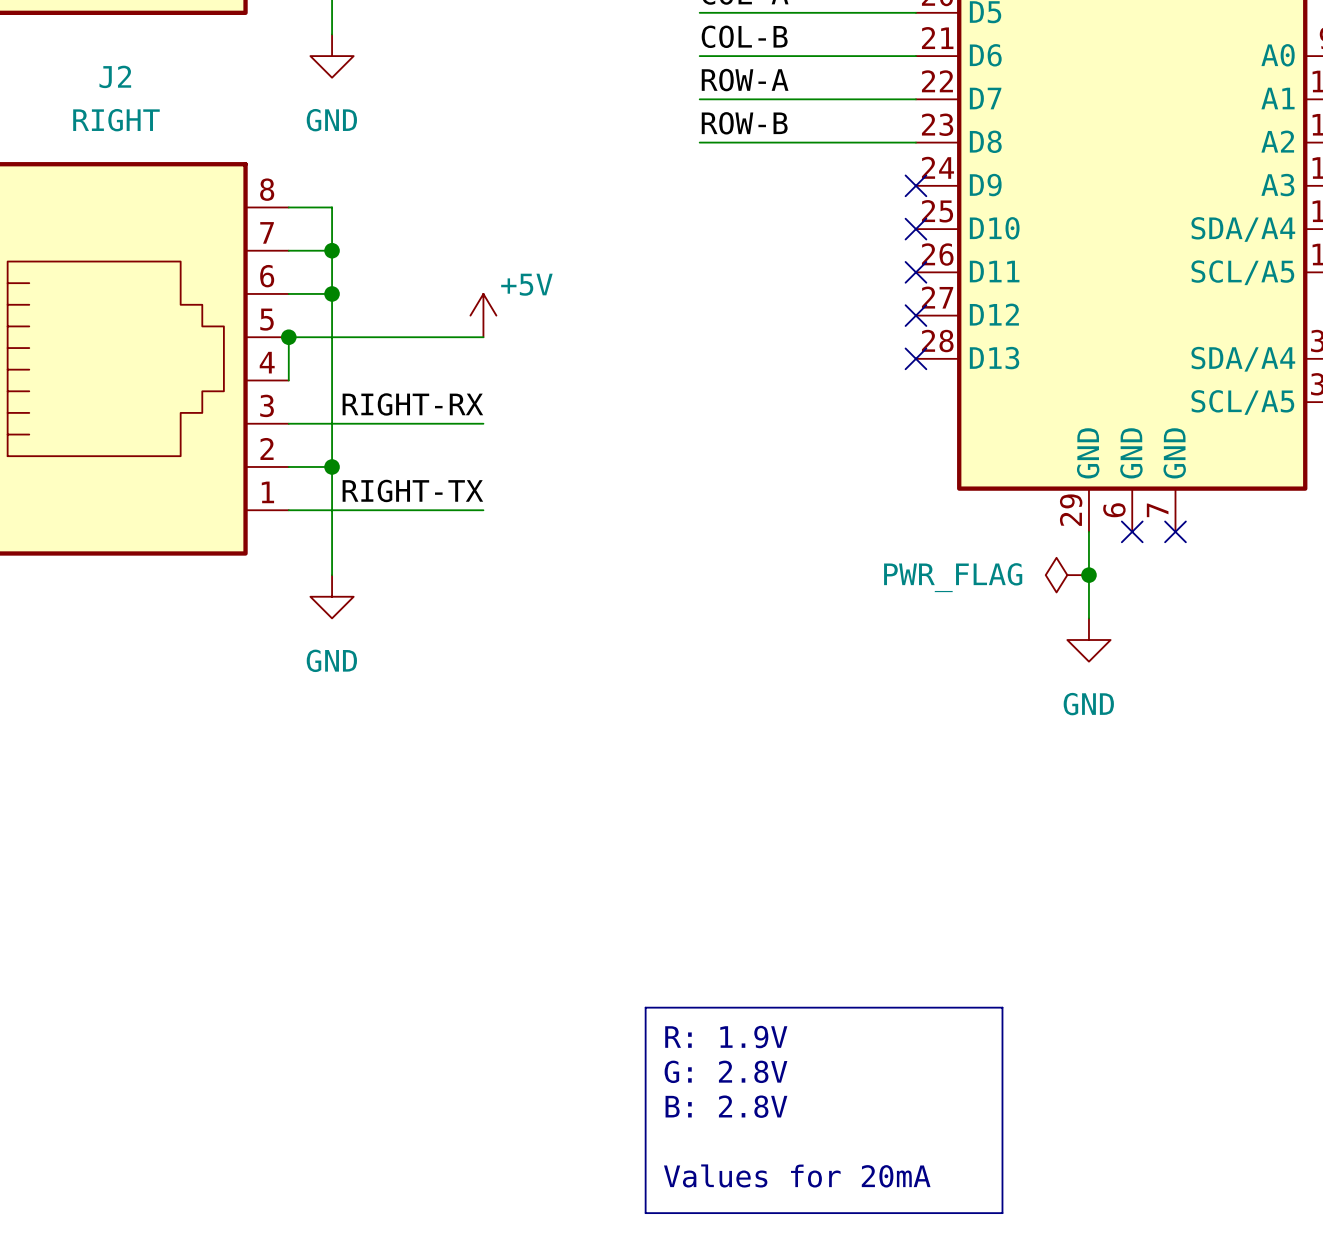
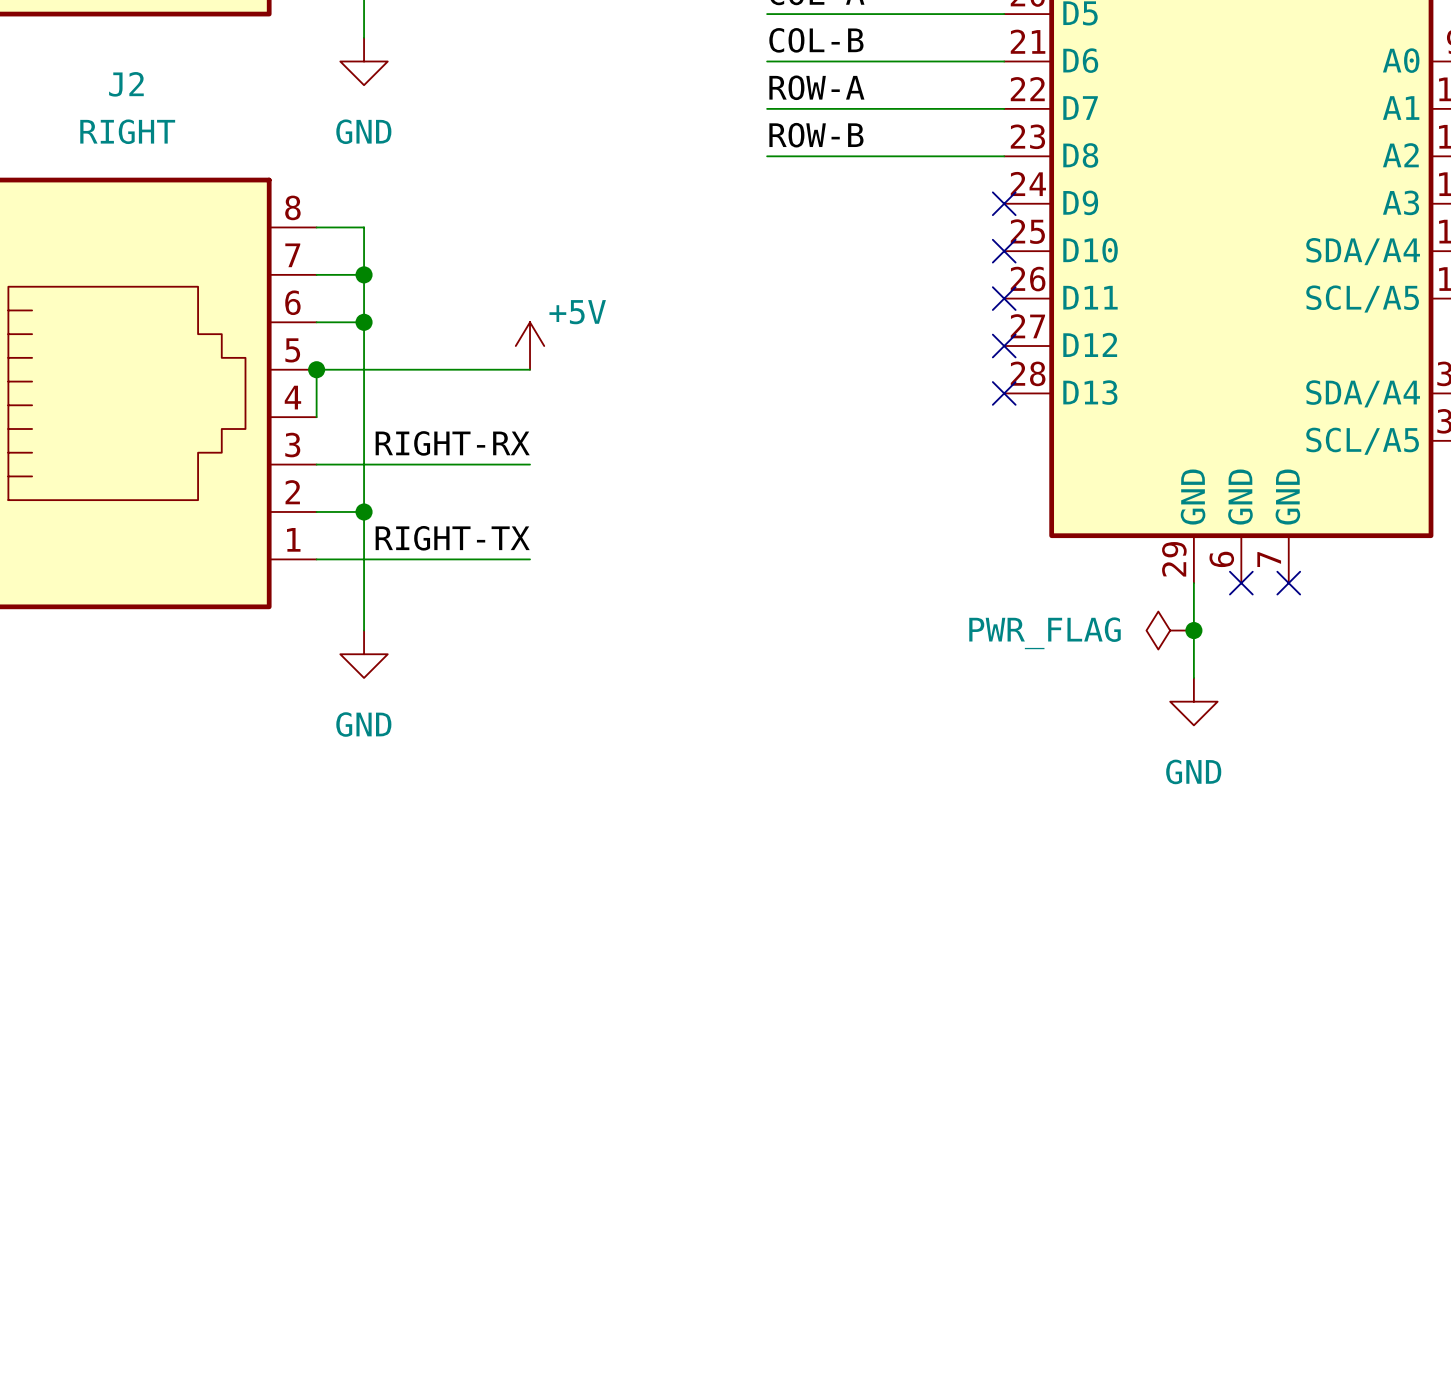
line: (645, 1007) (1002, 1007) (1002, 1213) (645, 1213) (645, 1007) -> none
text: R: 1.9V (726, 1037) -> none
text: G: 2.8V (725, 1071) -> none
text: B: 2.8V (726, 1106) -> none
text: Values for 20mA (797, 1175) -> none

